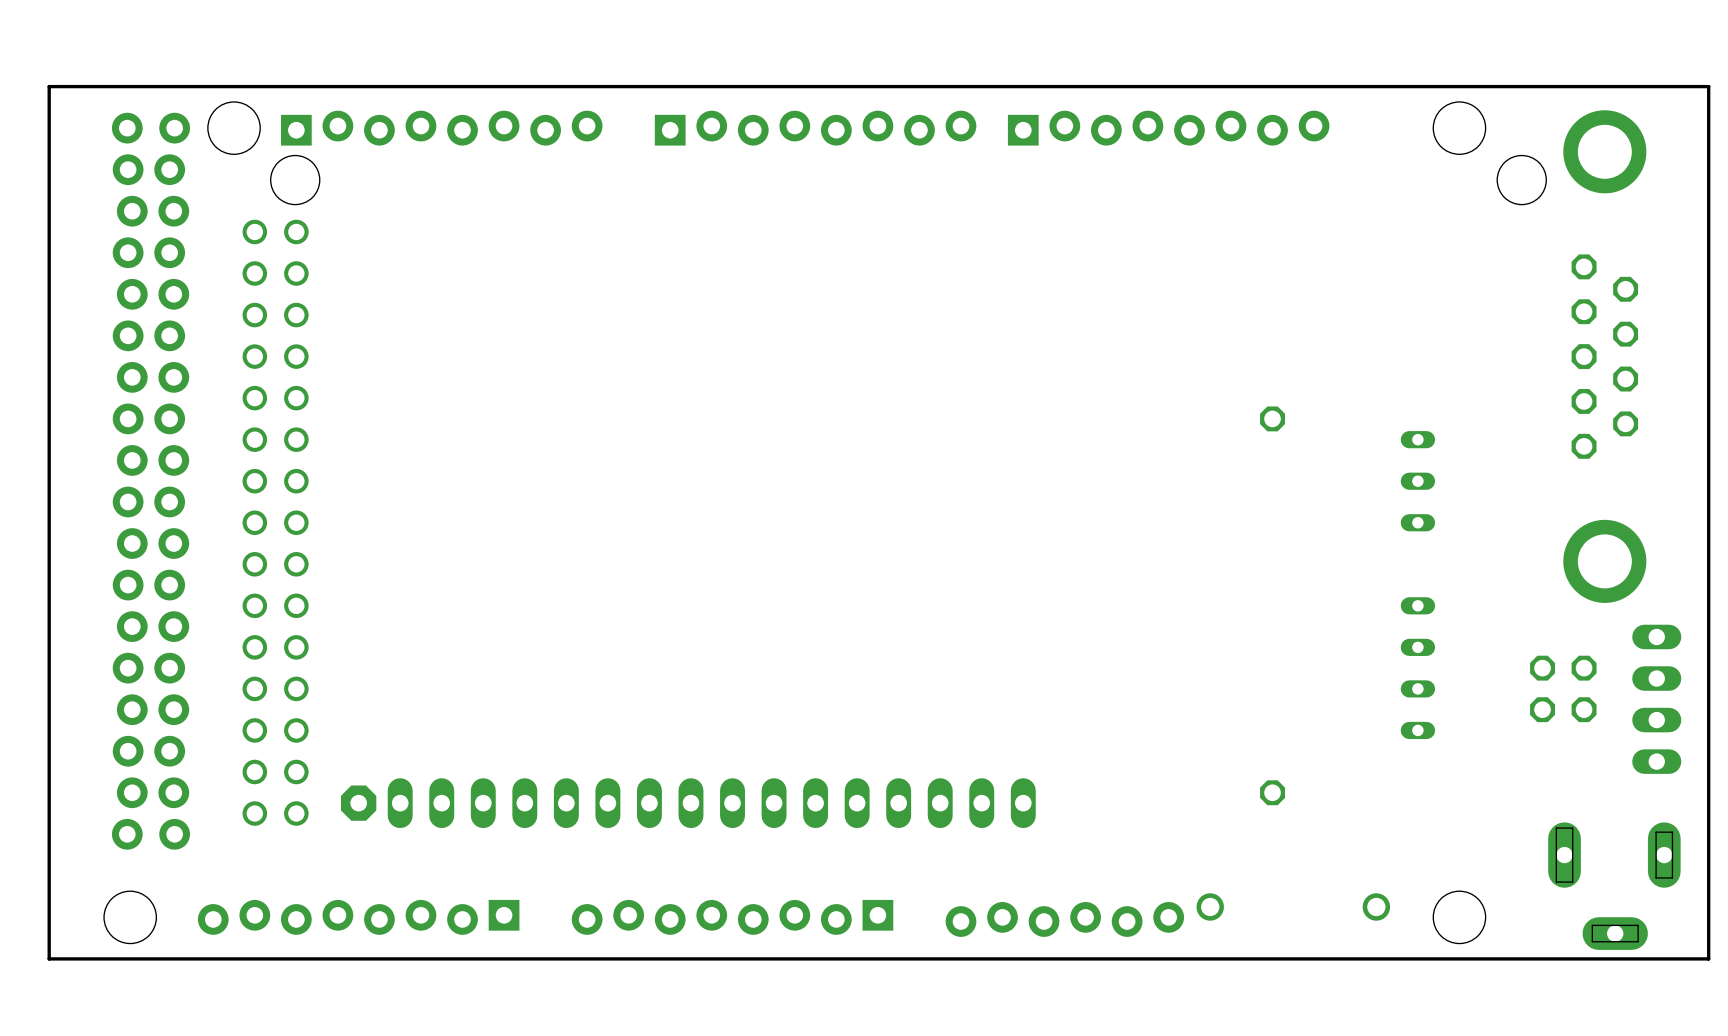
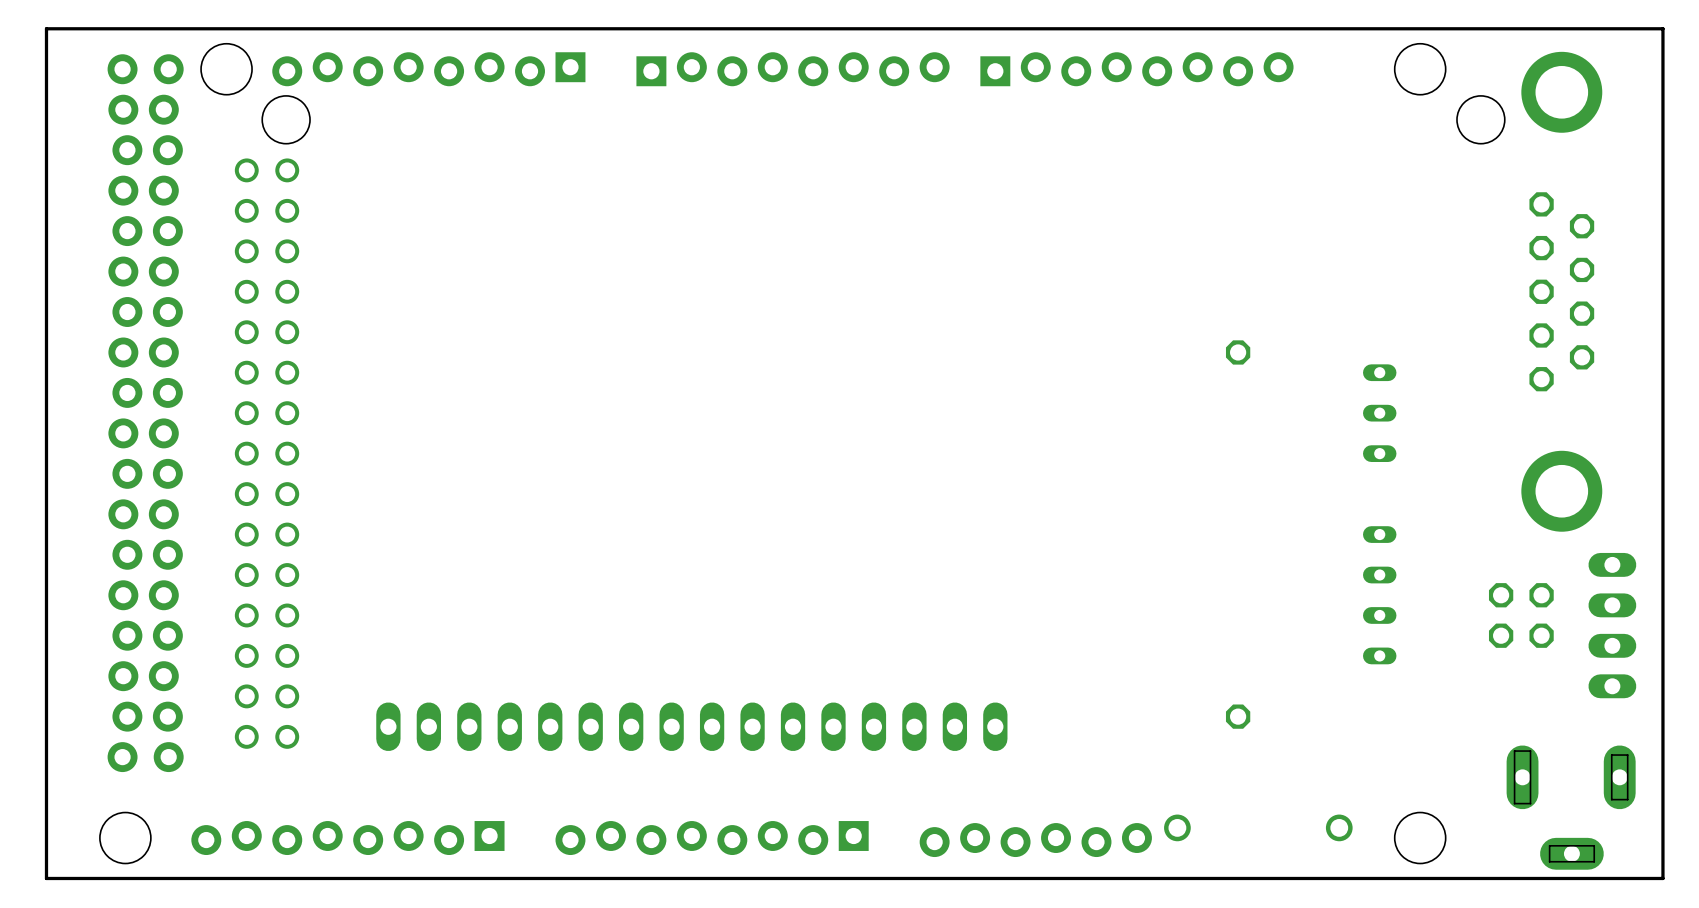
part rotation: 0° (441, 128) -> 180° (428, 69)
part: (358, 803) -> none

